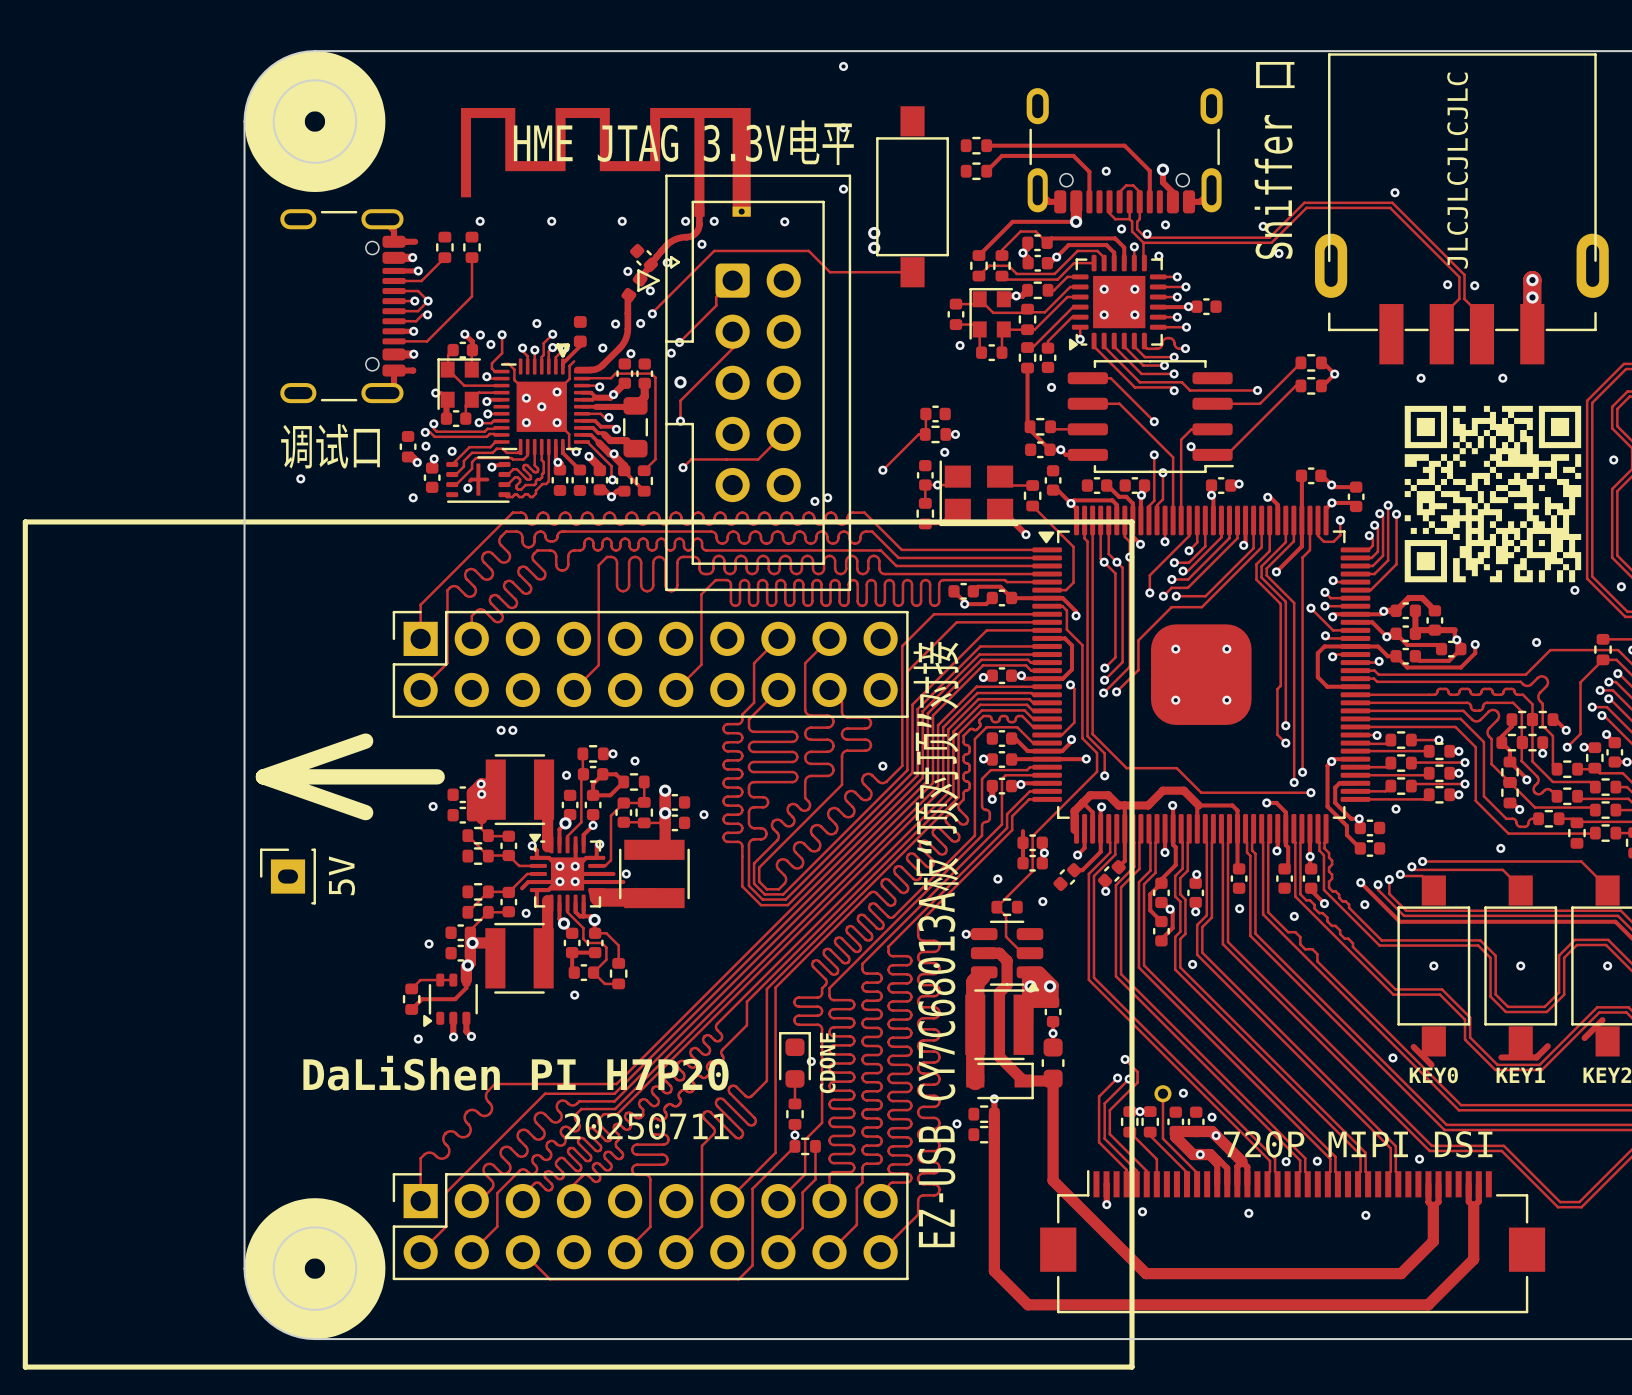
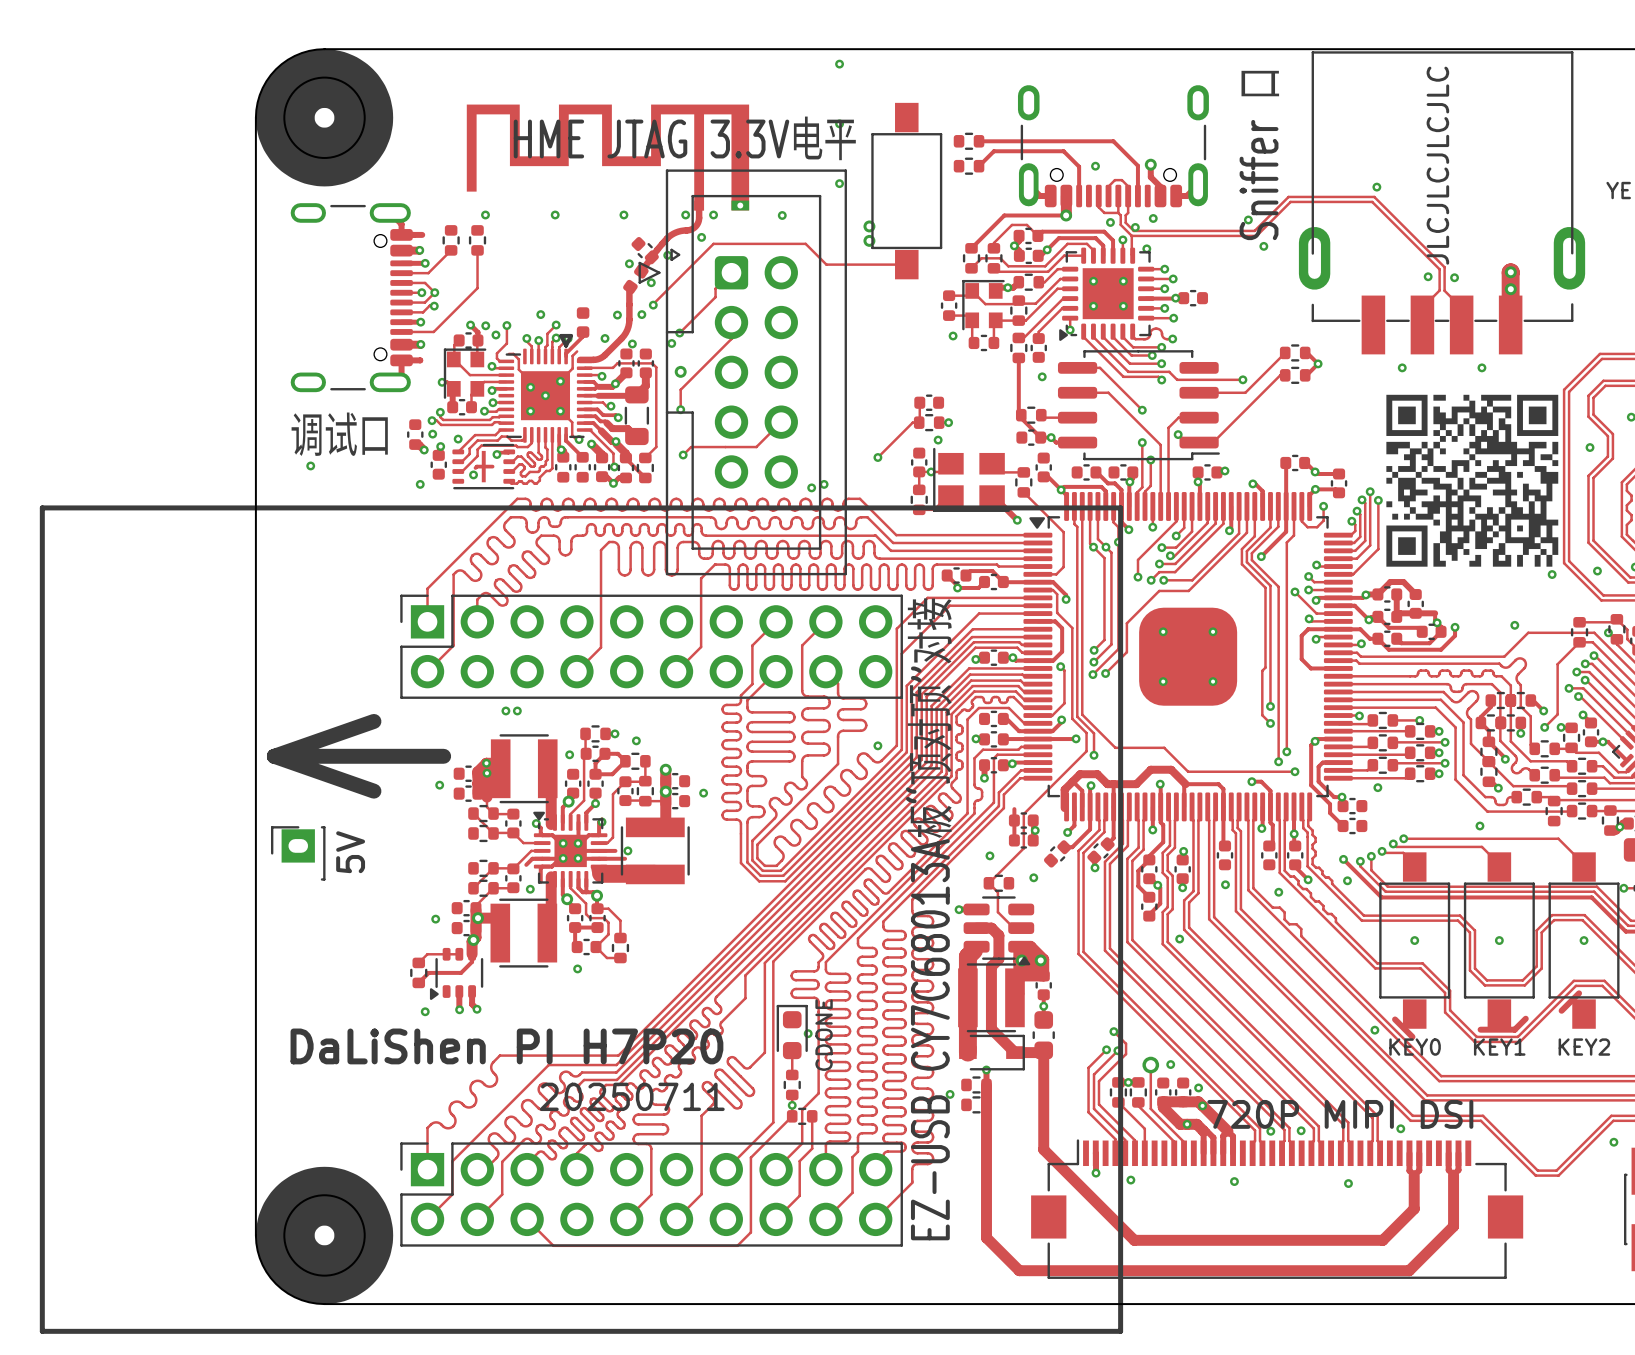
part footprint: [260, 848, 316, 905] -> [271, 826, 326, 881]

